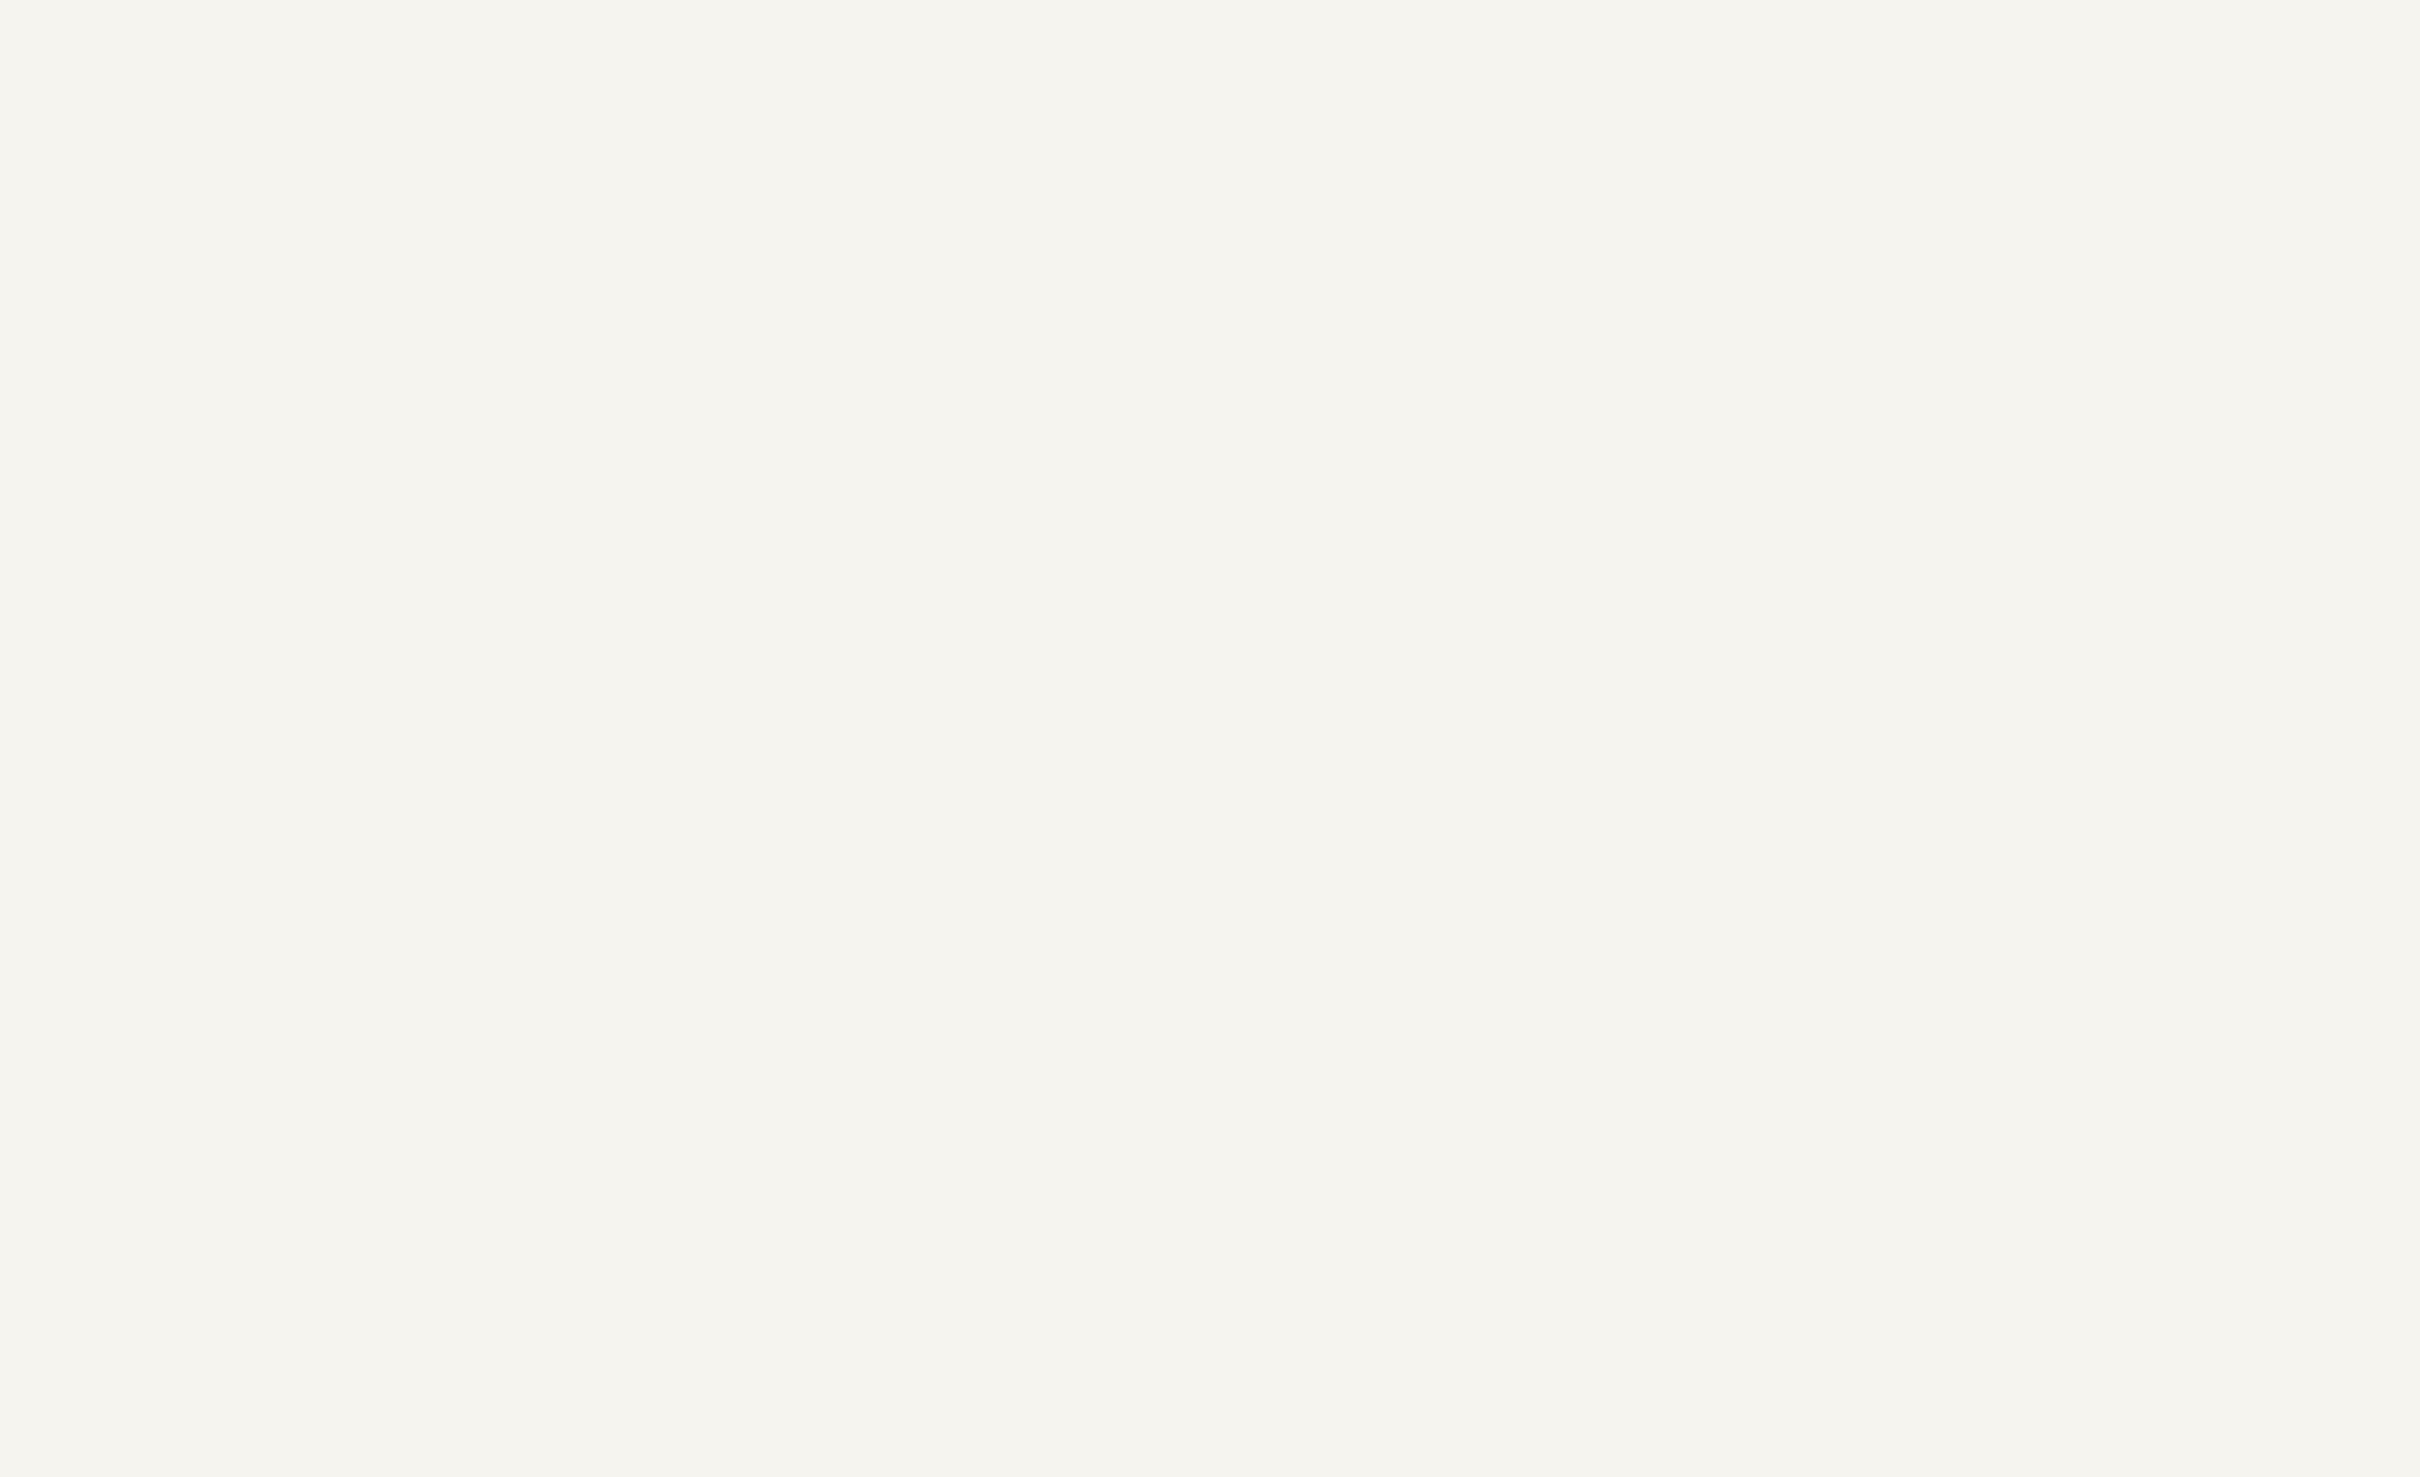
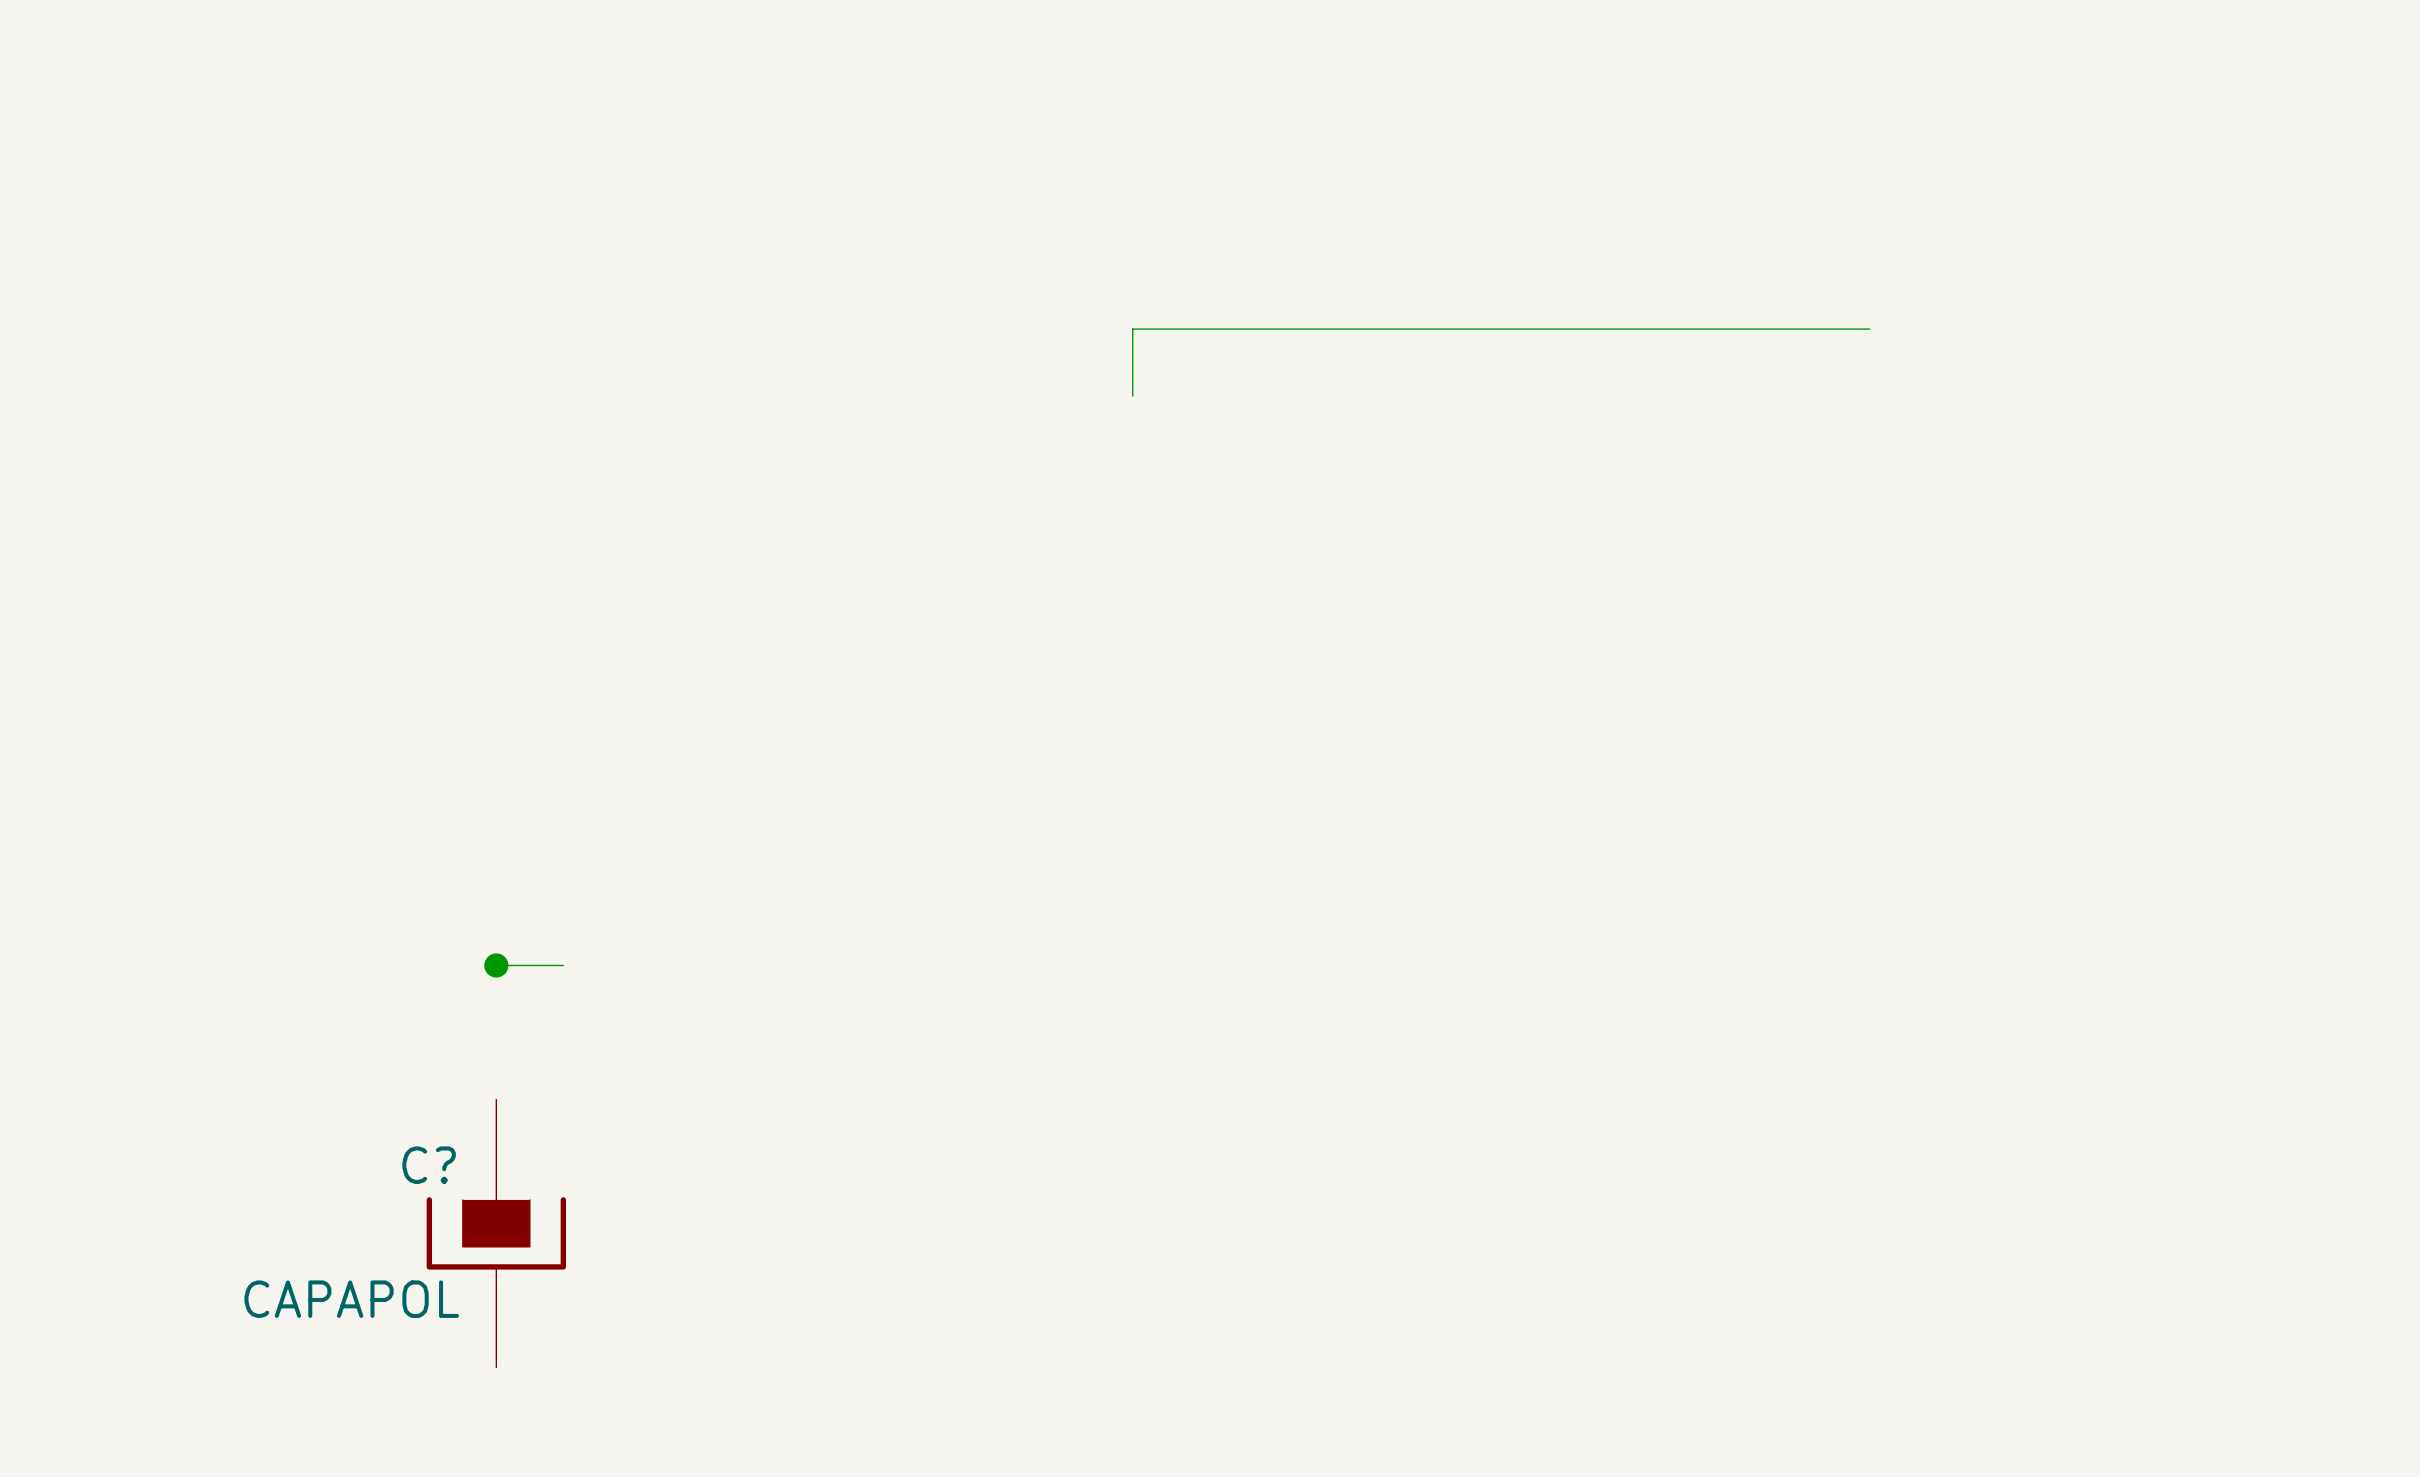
wire: none -> (1869, 329) (1132, 329) (1132, 396)
wire: none -> (496, 965) (563, 965)
junction: none -> (496, 965)
C?: none -> CAPAPOL (496, 1233)

